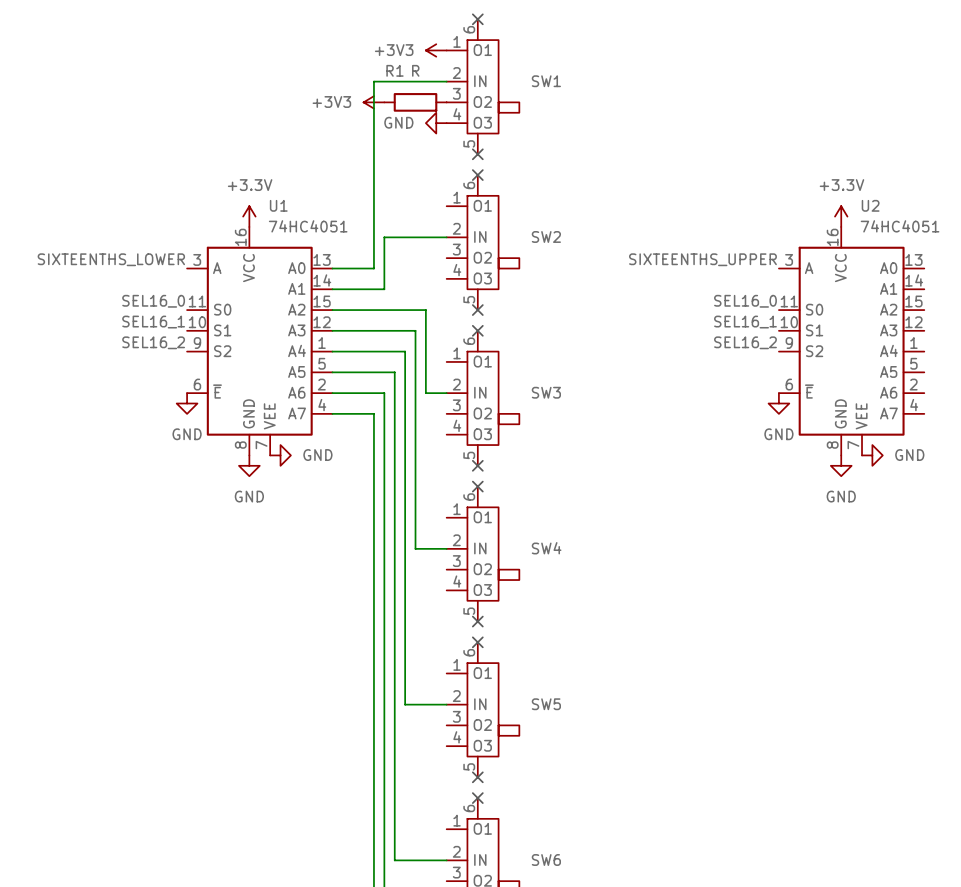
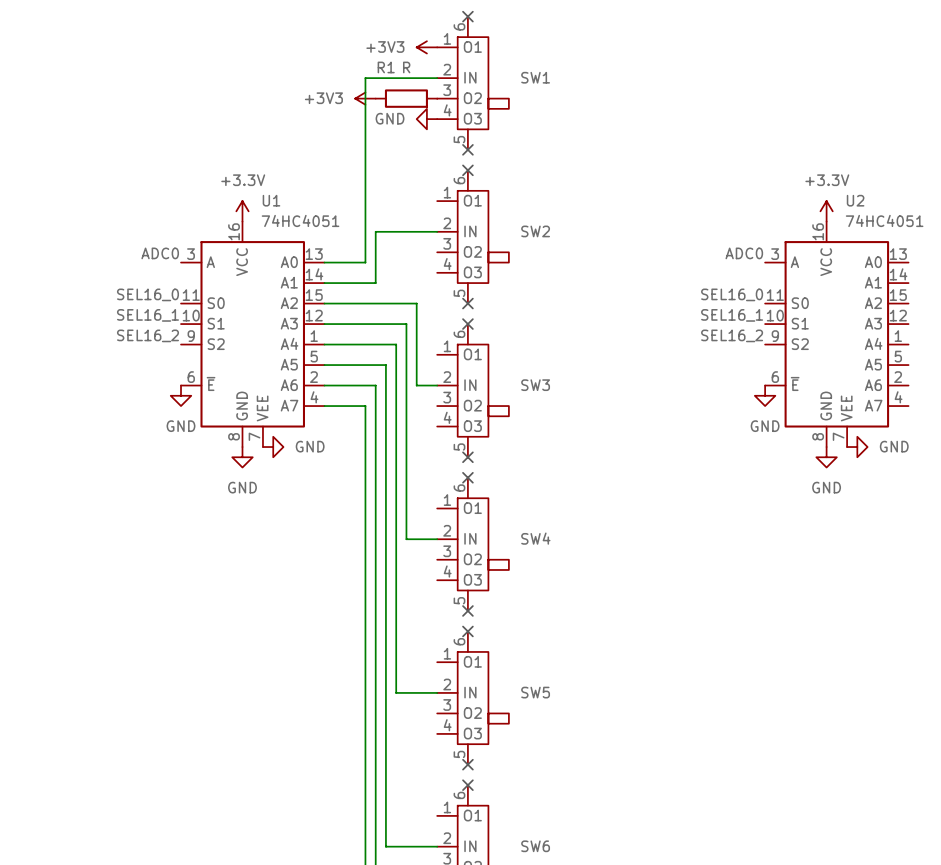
label: SIXTEENTHS_LOWER (111, 259) -> ADC0 (160, 253)
label: SIXTEENTHS_UPPER (702, 259) -> ADC0 (744, 253)

